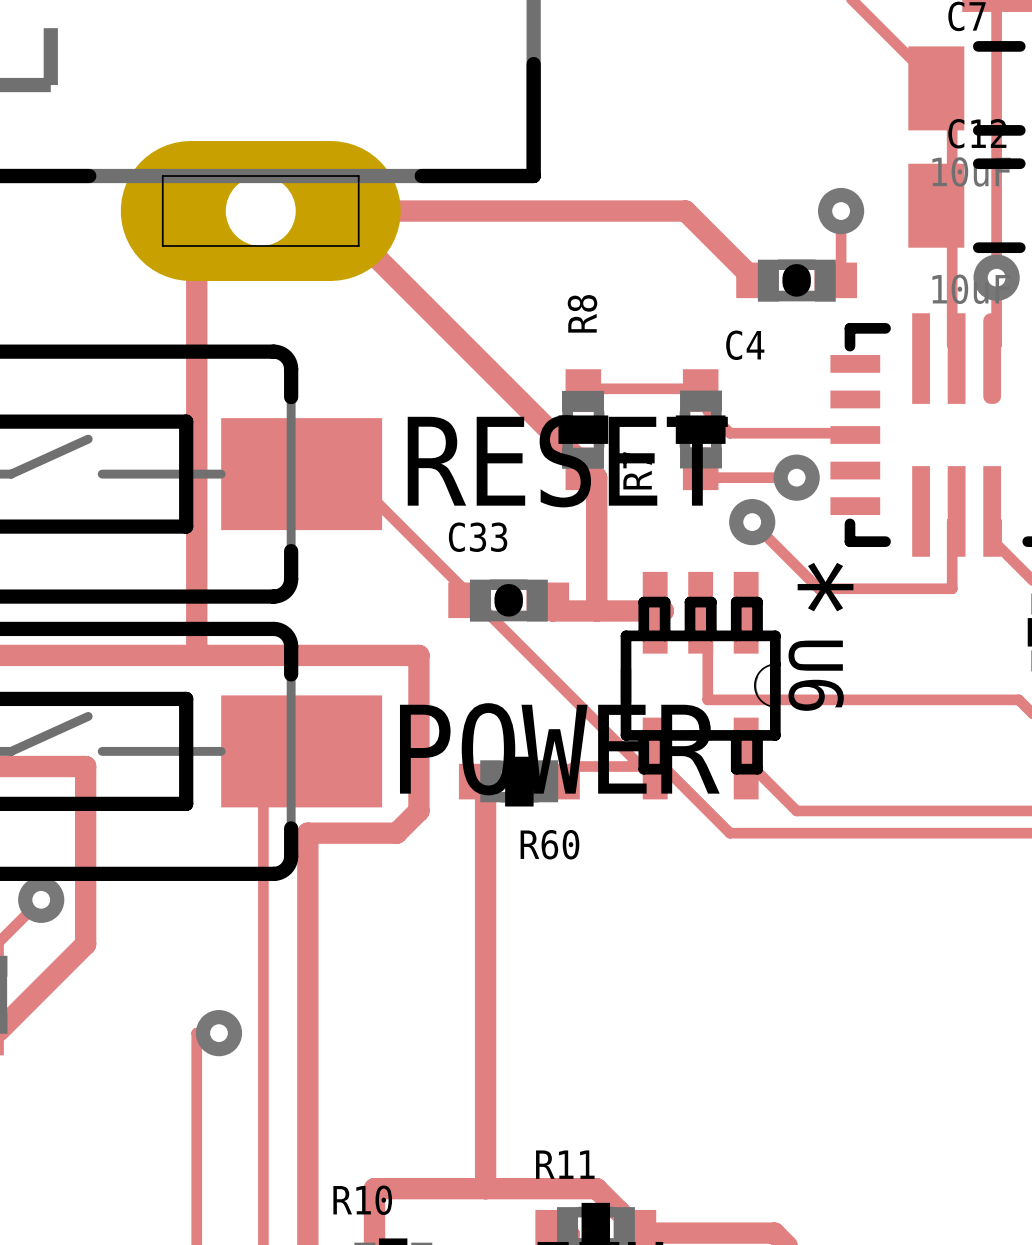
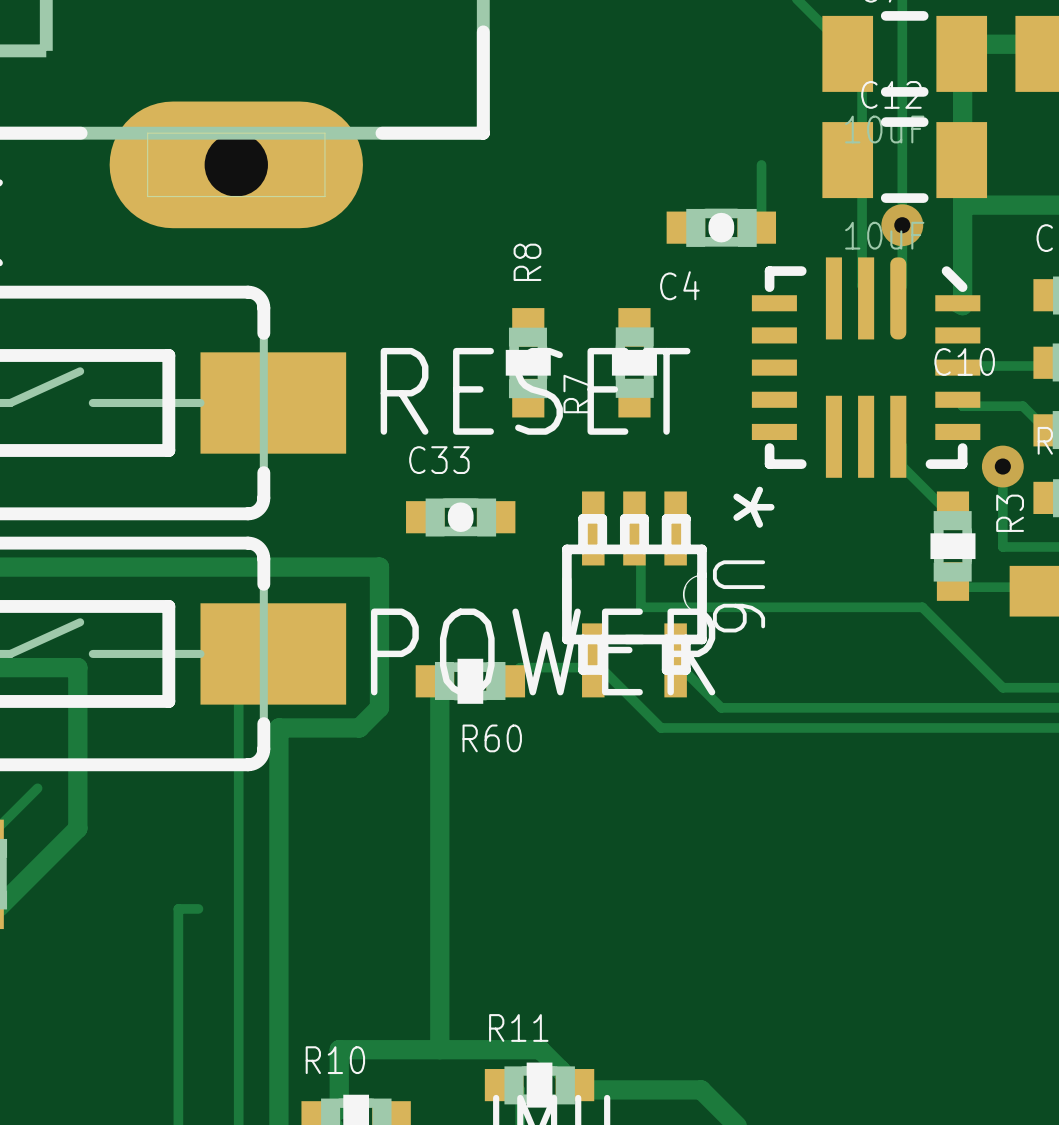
track: (260, 211) (685, 211) (752, 277) (757, 280) -> none
track: (260, 211) (330, 211) (574, 455) (583, 468) (596, 477) (596, 610) -> none
track: (260, 211) (196, 211) (196, 655) -> none
via: (841, 211) -> none
track: (583, 390) (596, 388) (685, 388) (700, 390) (707, 411) (730, 433) (841, 433) (855, 435) -> none
track: (700, 468) (707, 477) (796, 477) -> none
track: (301, 474) (307, 477) (352, 477) (463, 588) (469, 600) (485, 610) (641, 766) -> none
via: (796, 477) -> none
track: (956, 511) (952, 522) (952, 588) (818, 588) (752, 522) -> none
via: (752, 522) -> none
track: (547, 600) (552, 610) (663, 610) (655, 612) -> none
via: (41, 899) -> none
via: (218, 1033) -> none

